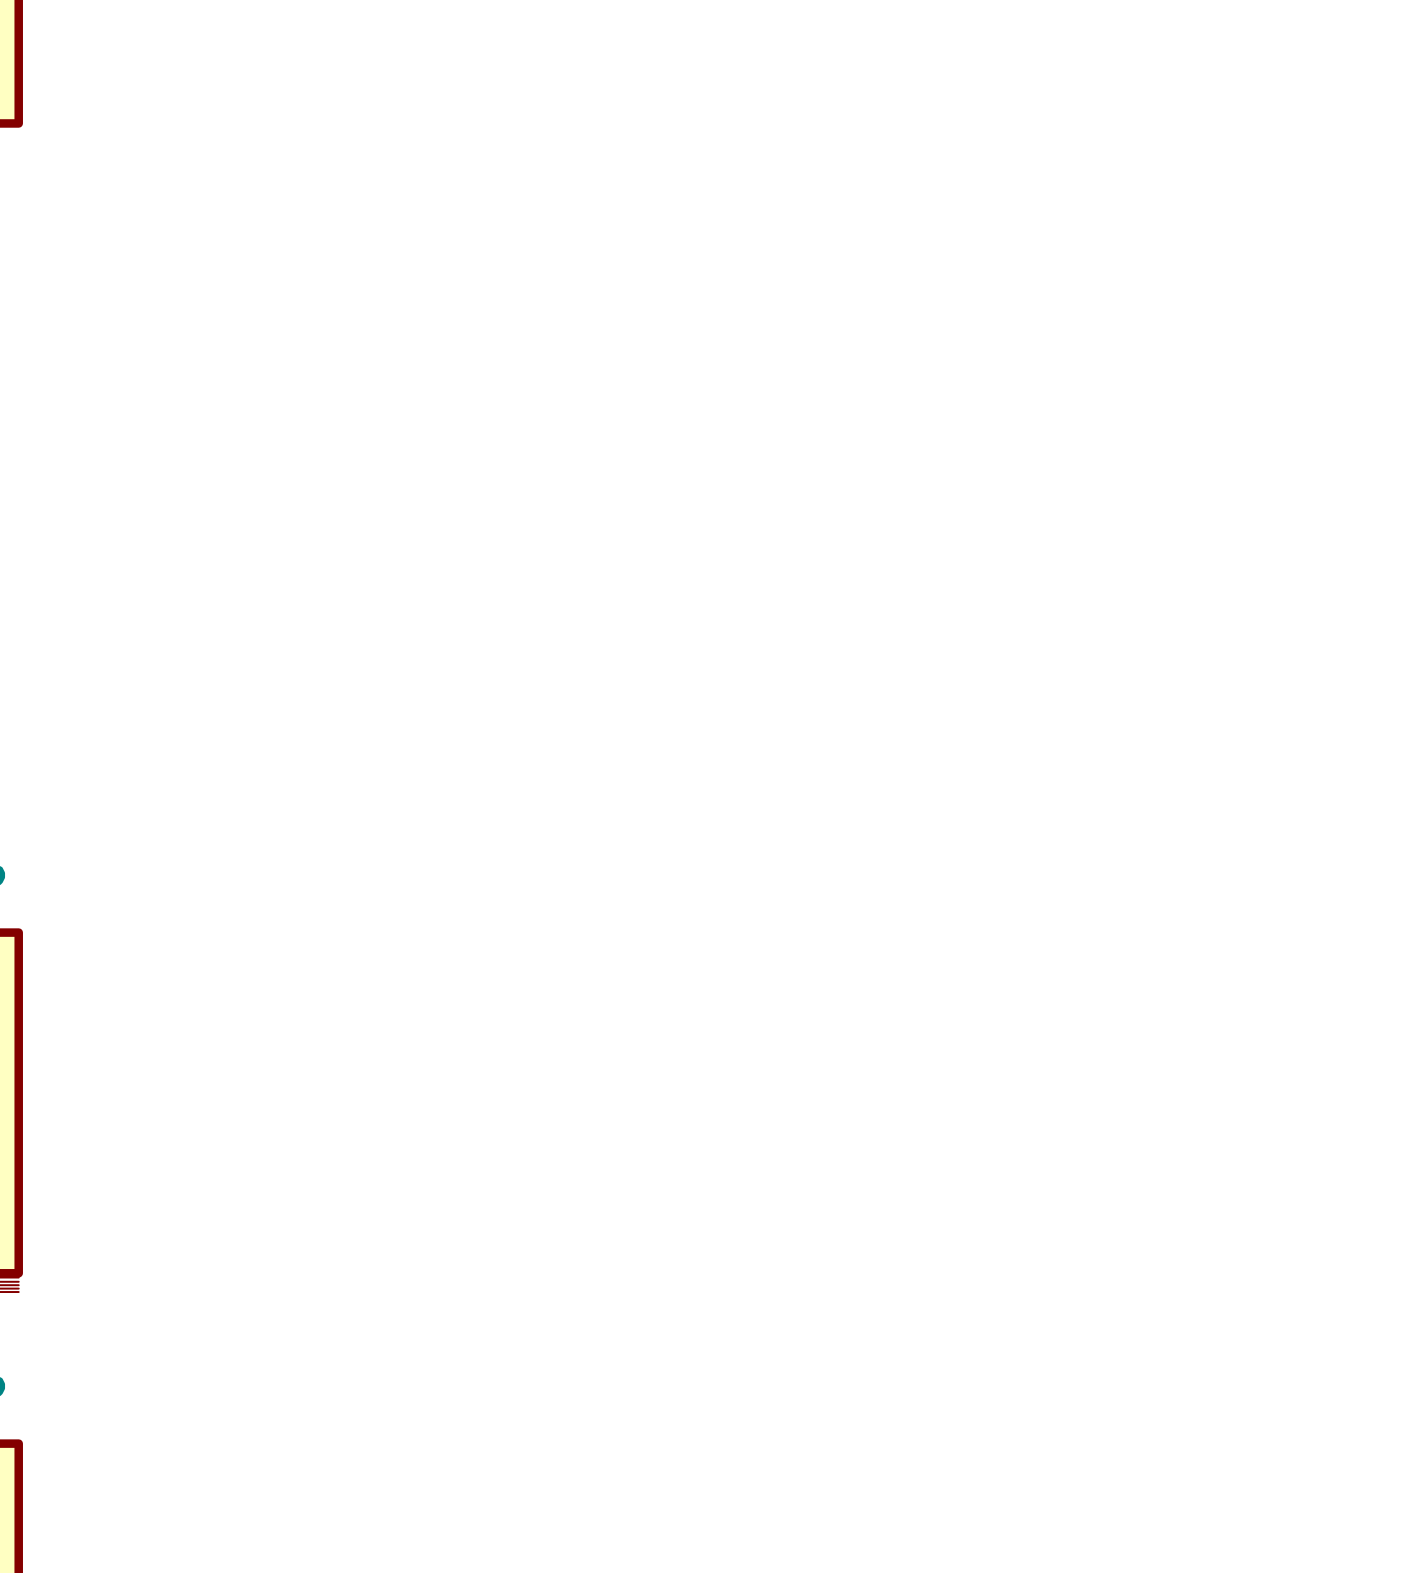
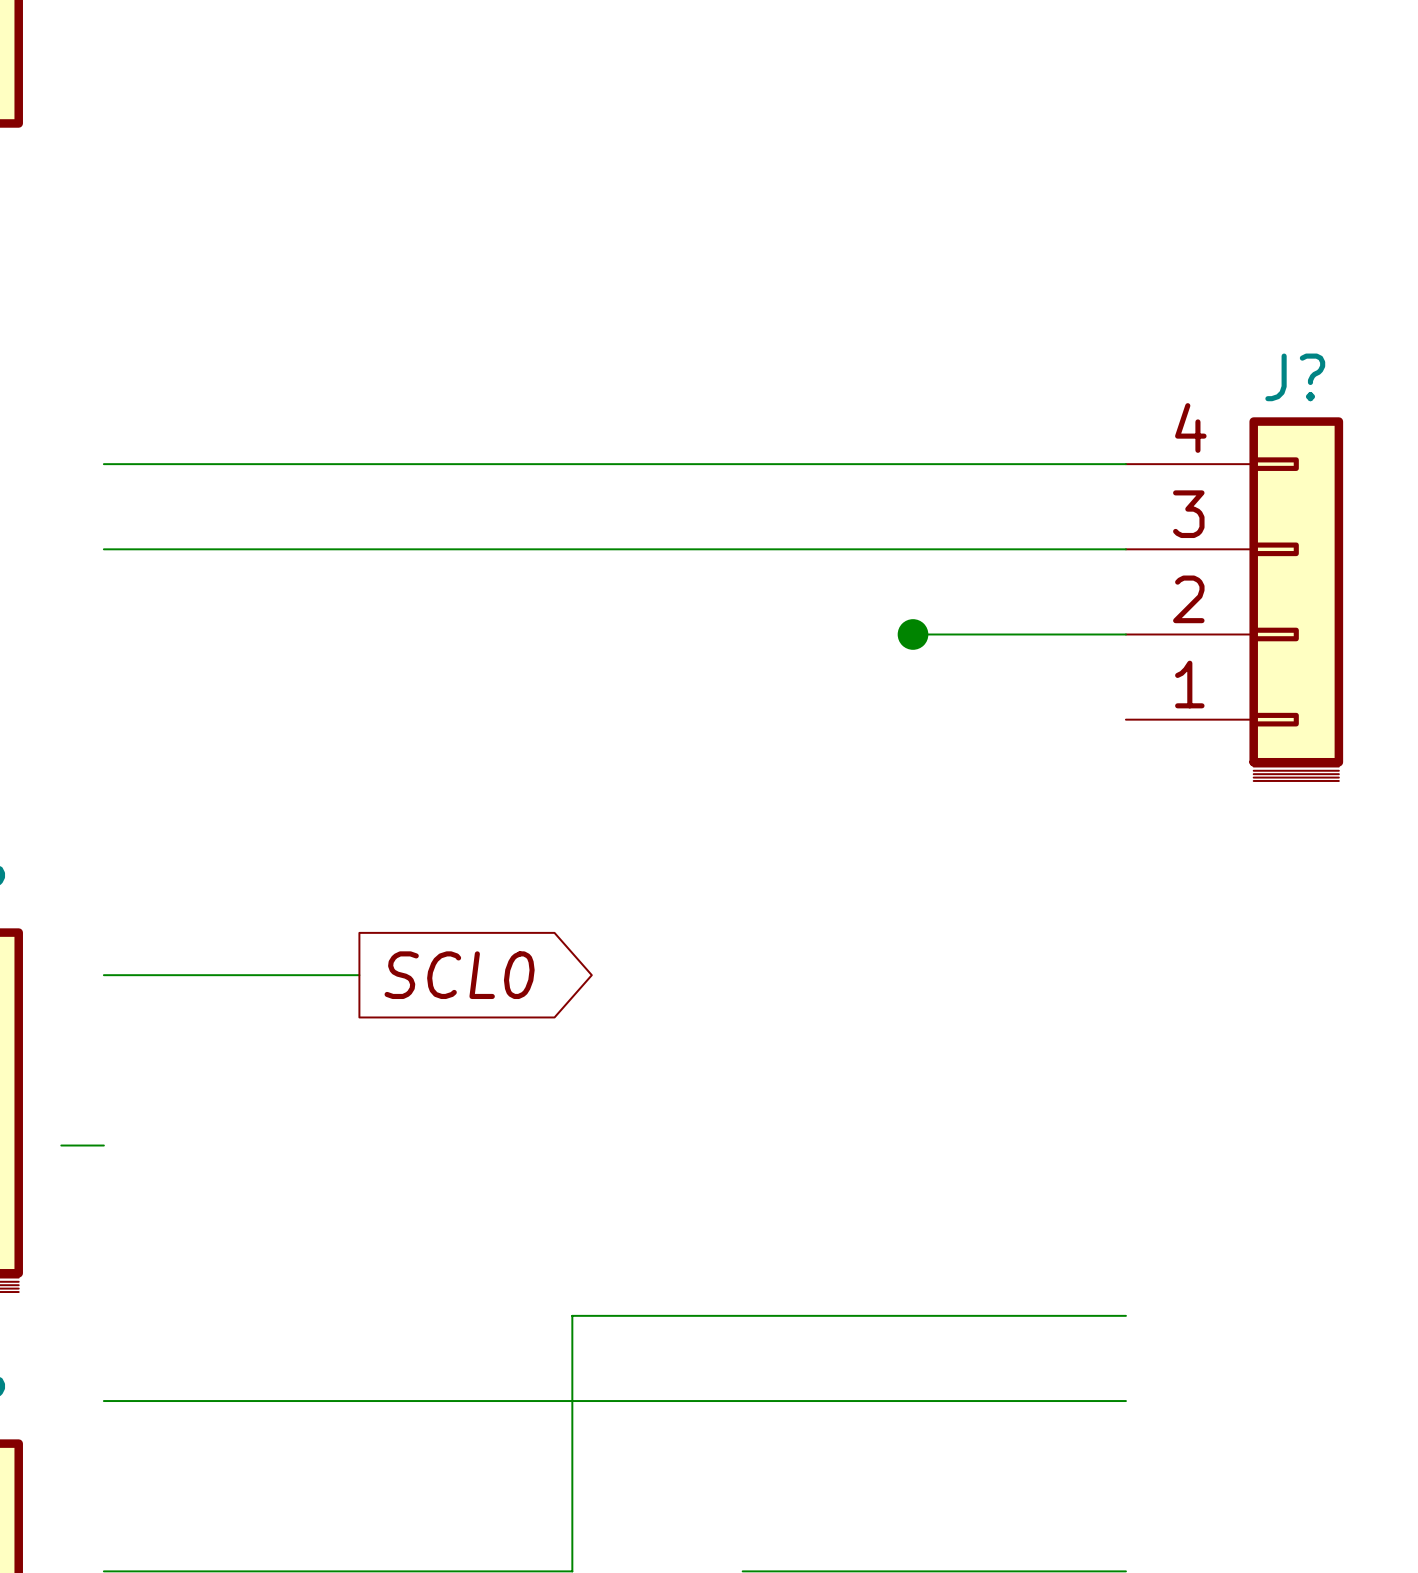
wire: none -> (103, 464) (1125, 464)
wire: none -> (103, 549) (1125, 549)
J?: none -> (1234, 599)
wire: none -> (913, 634) (1125, 634)
junction: none -> (913, 634)
wire: none -> (103, 975) (359, 975)
global label: none -> SCL0 (459, 975)
wire: none -> (61, 1145) (103, 1145)
wire: none -> (1125, 1315) (572, 1315) (572, 1571) (103, 1571)
wire: none -> (103, 1401) (1125, 1401)
wire: none -> (742, 1571) (1125, 1571)

